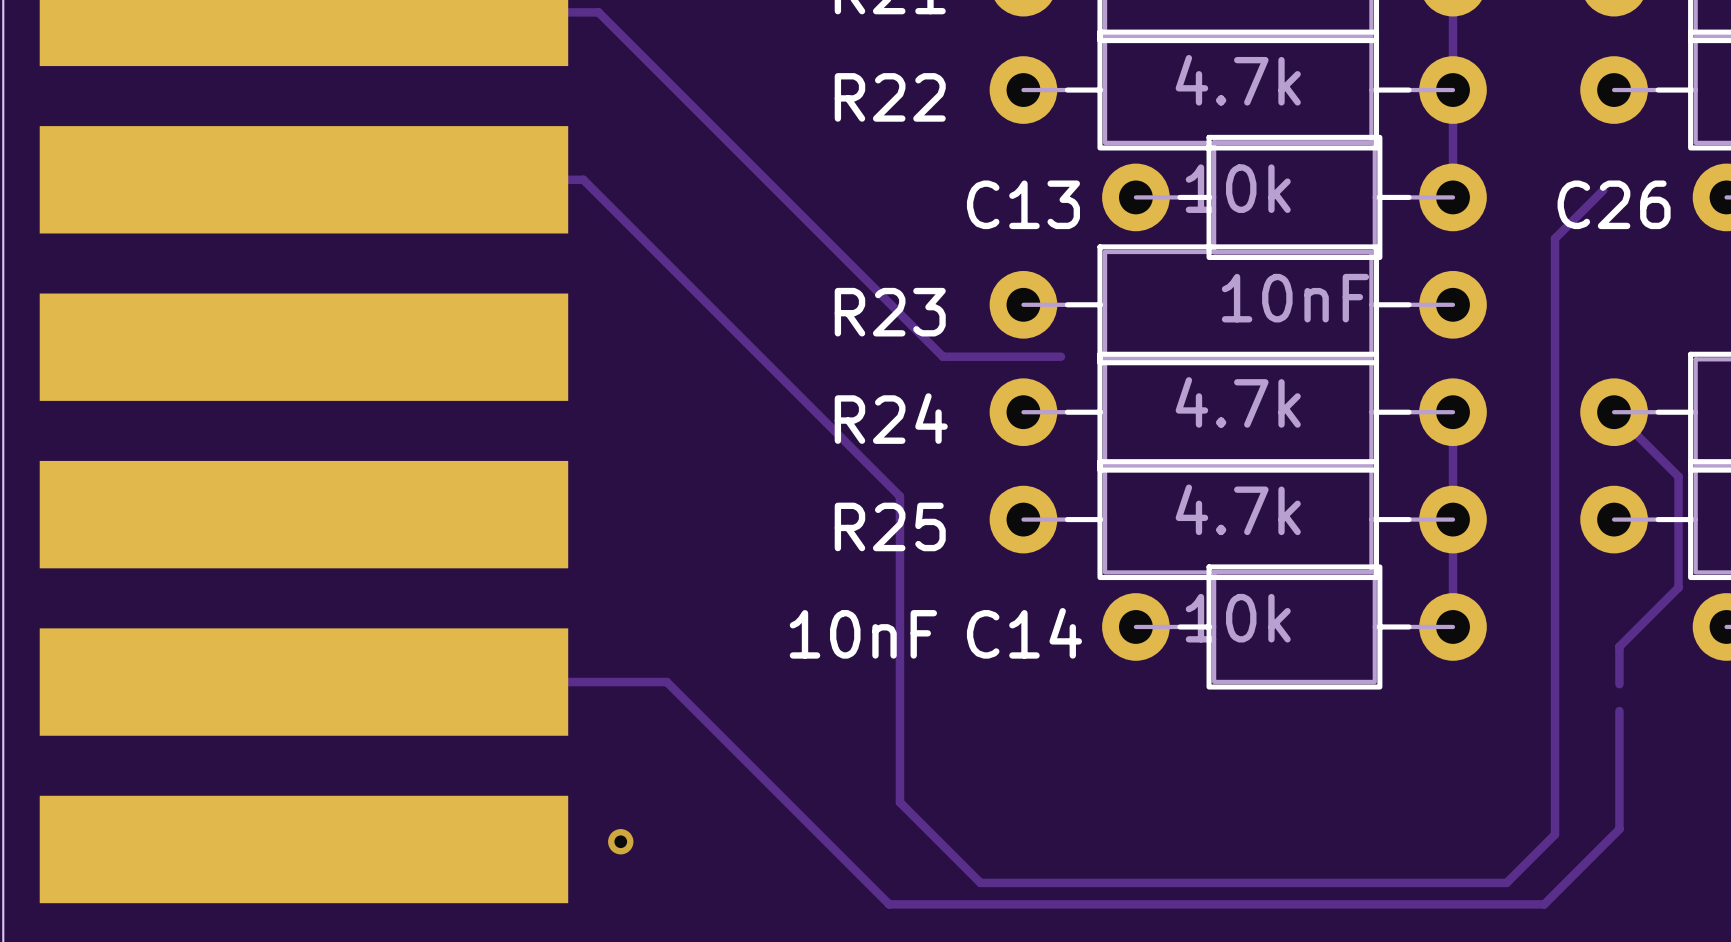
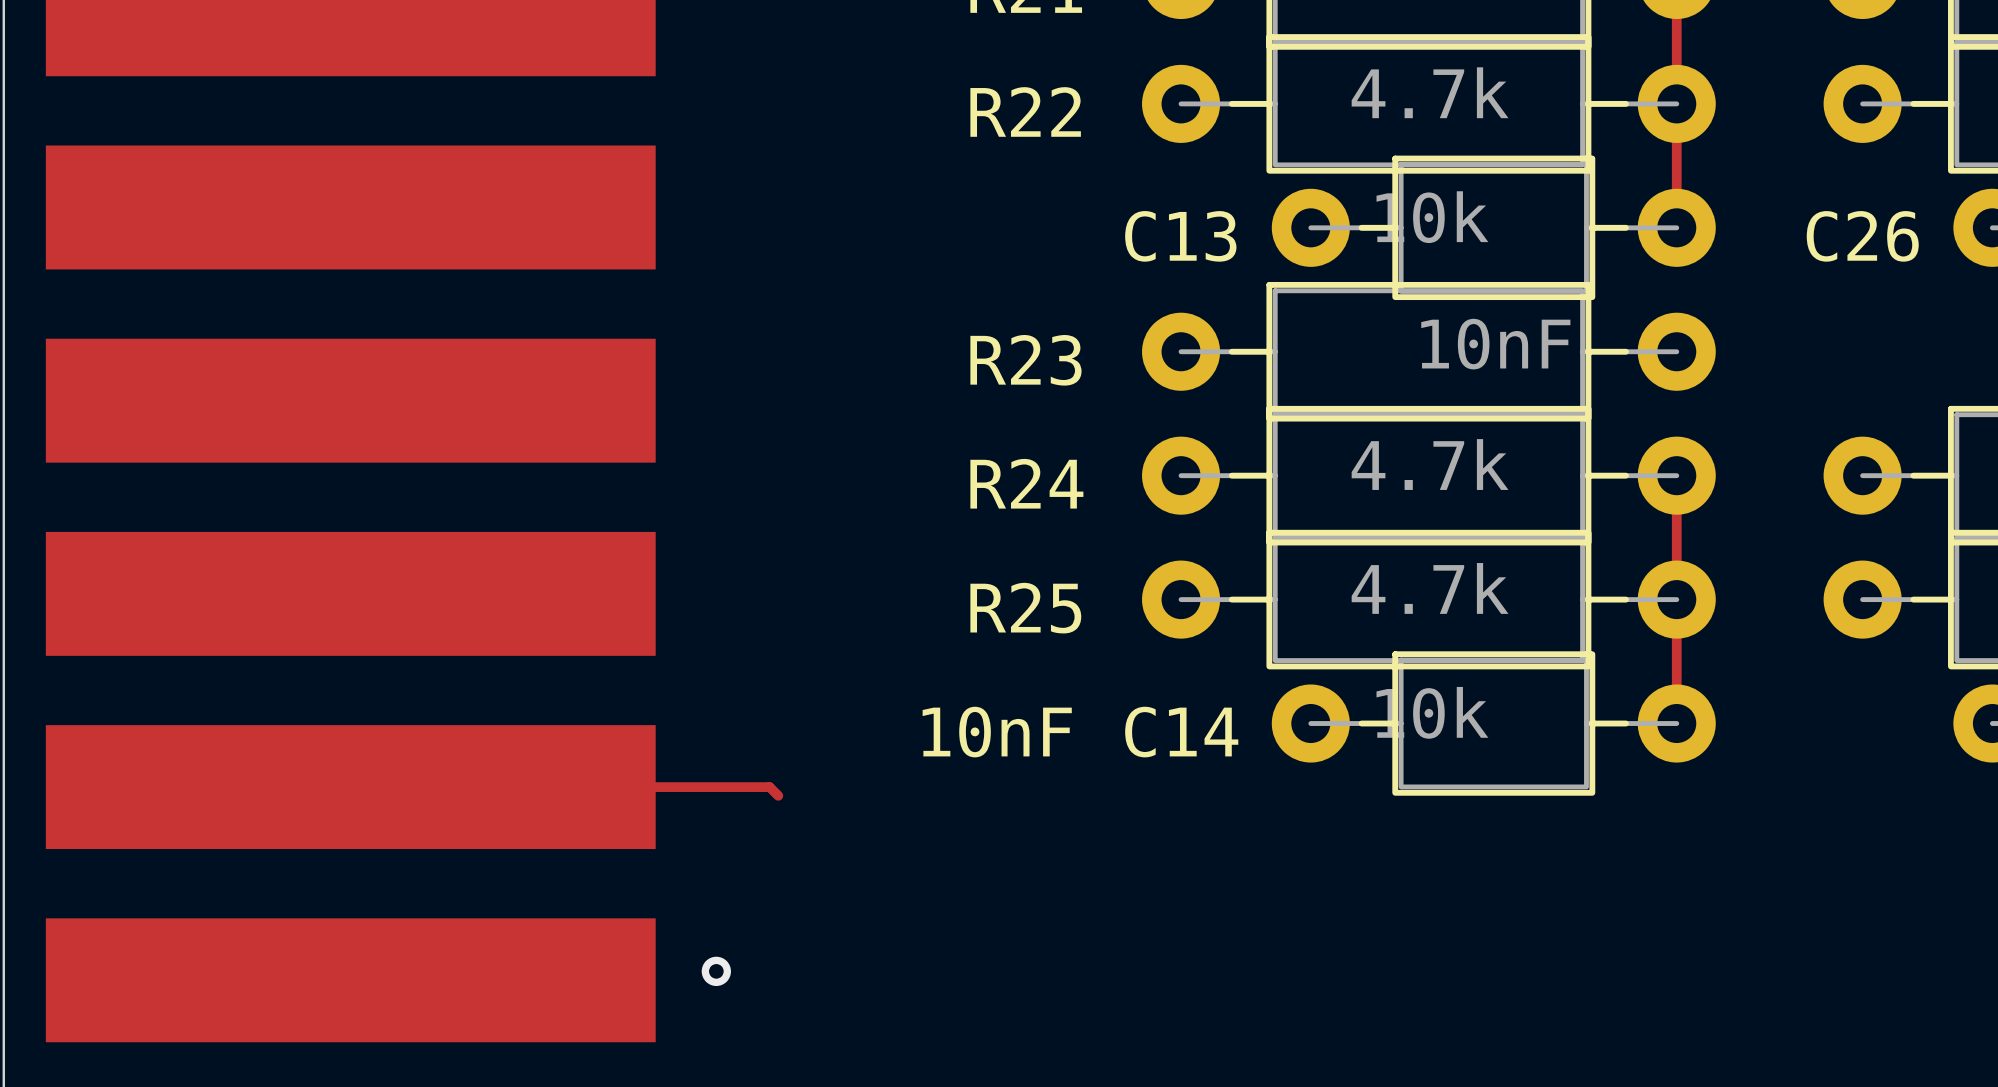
track: (303, 12) (598, 12) (942, 356) (1061, 356) -> none
track: (303, 179) (583, 179) (899, 496) (899, 802) (980, 882) (1506, 882) (1555, 834) (1555, 238) (1603, 190) -> none
track: (1614, 412) (1678, 476) (1678, 587) (1619, 646) (1619, 684) -> none
track: (674, 689) (889, 904) (1544, 904) (1619, 829) (1619, 711) -> none

